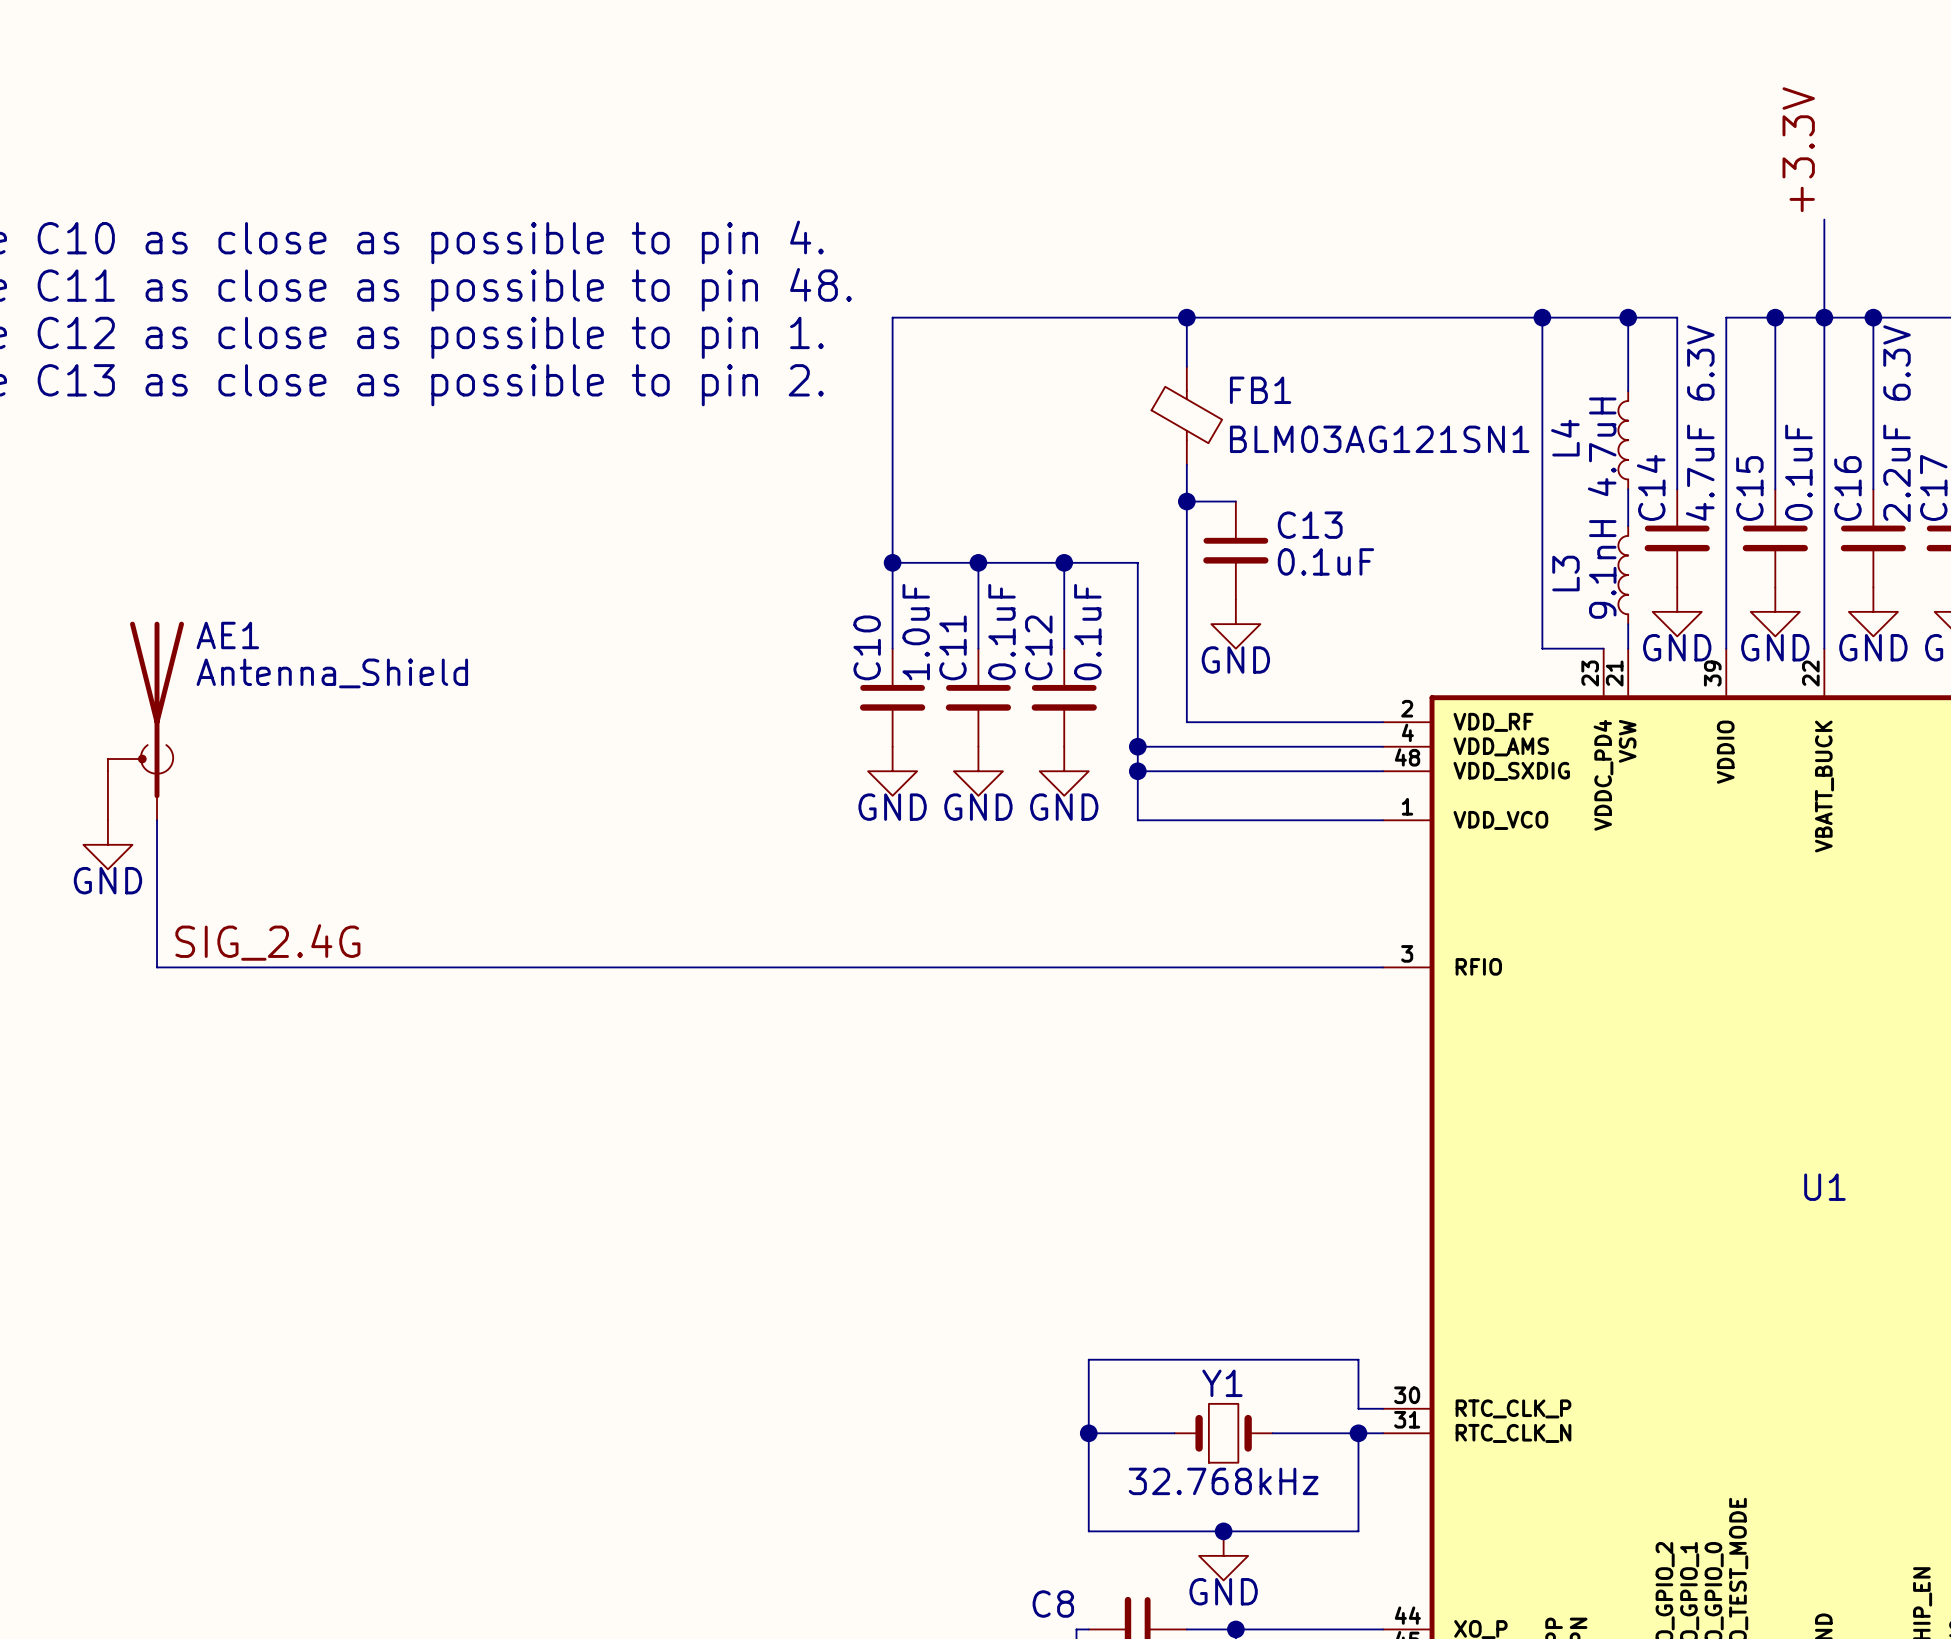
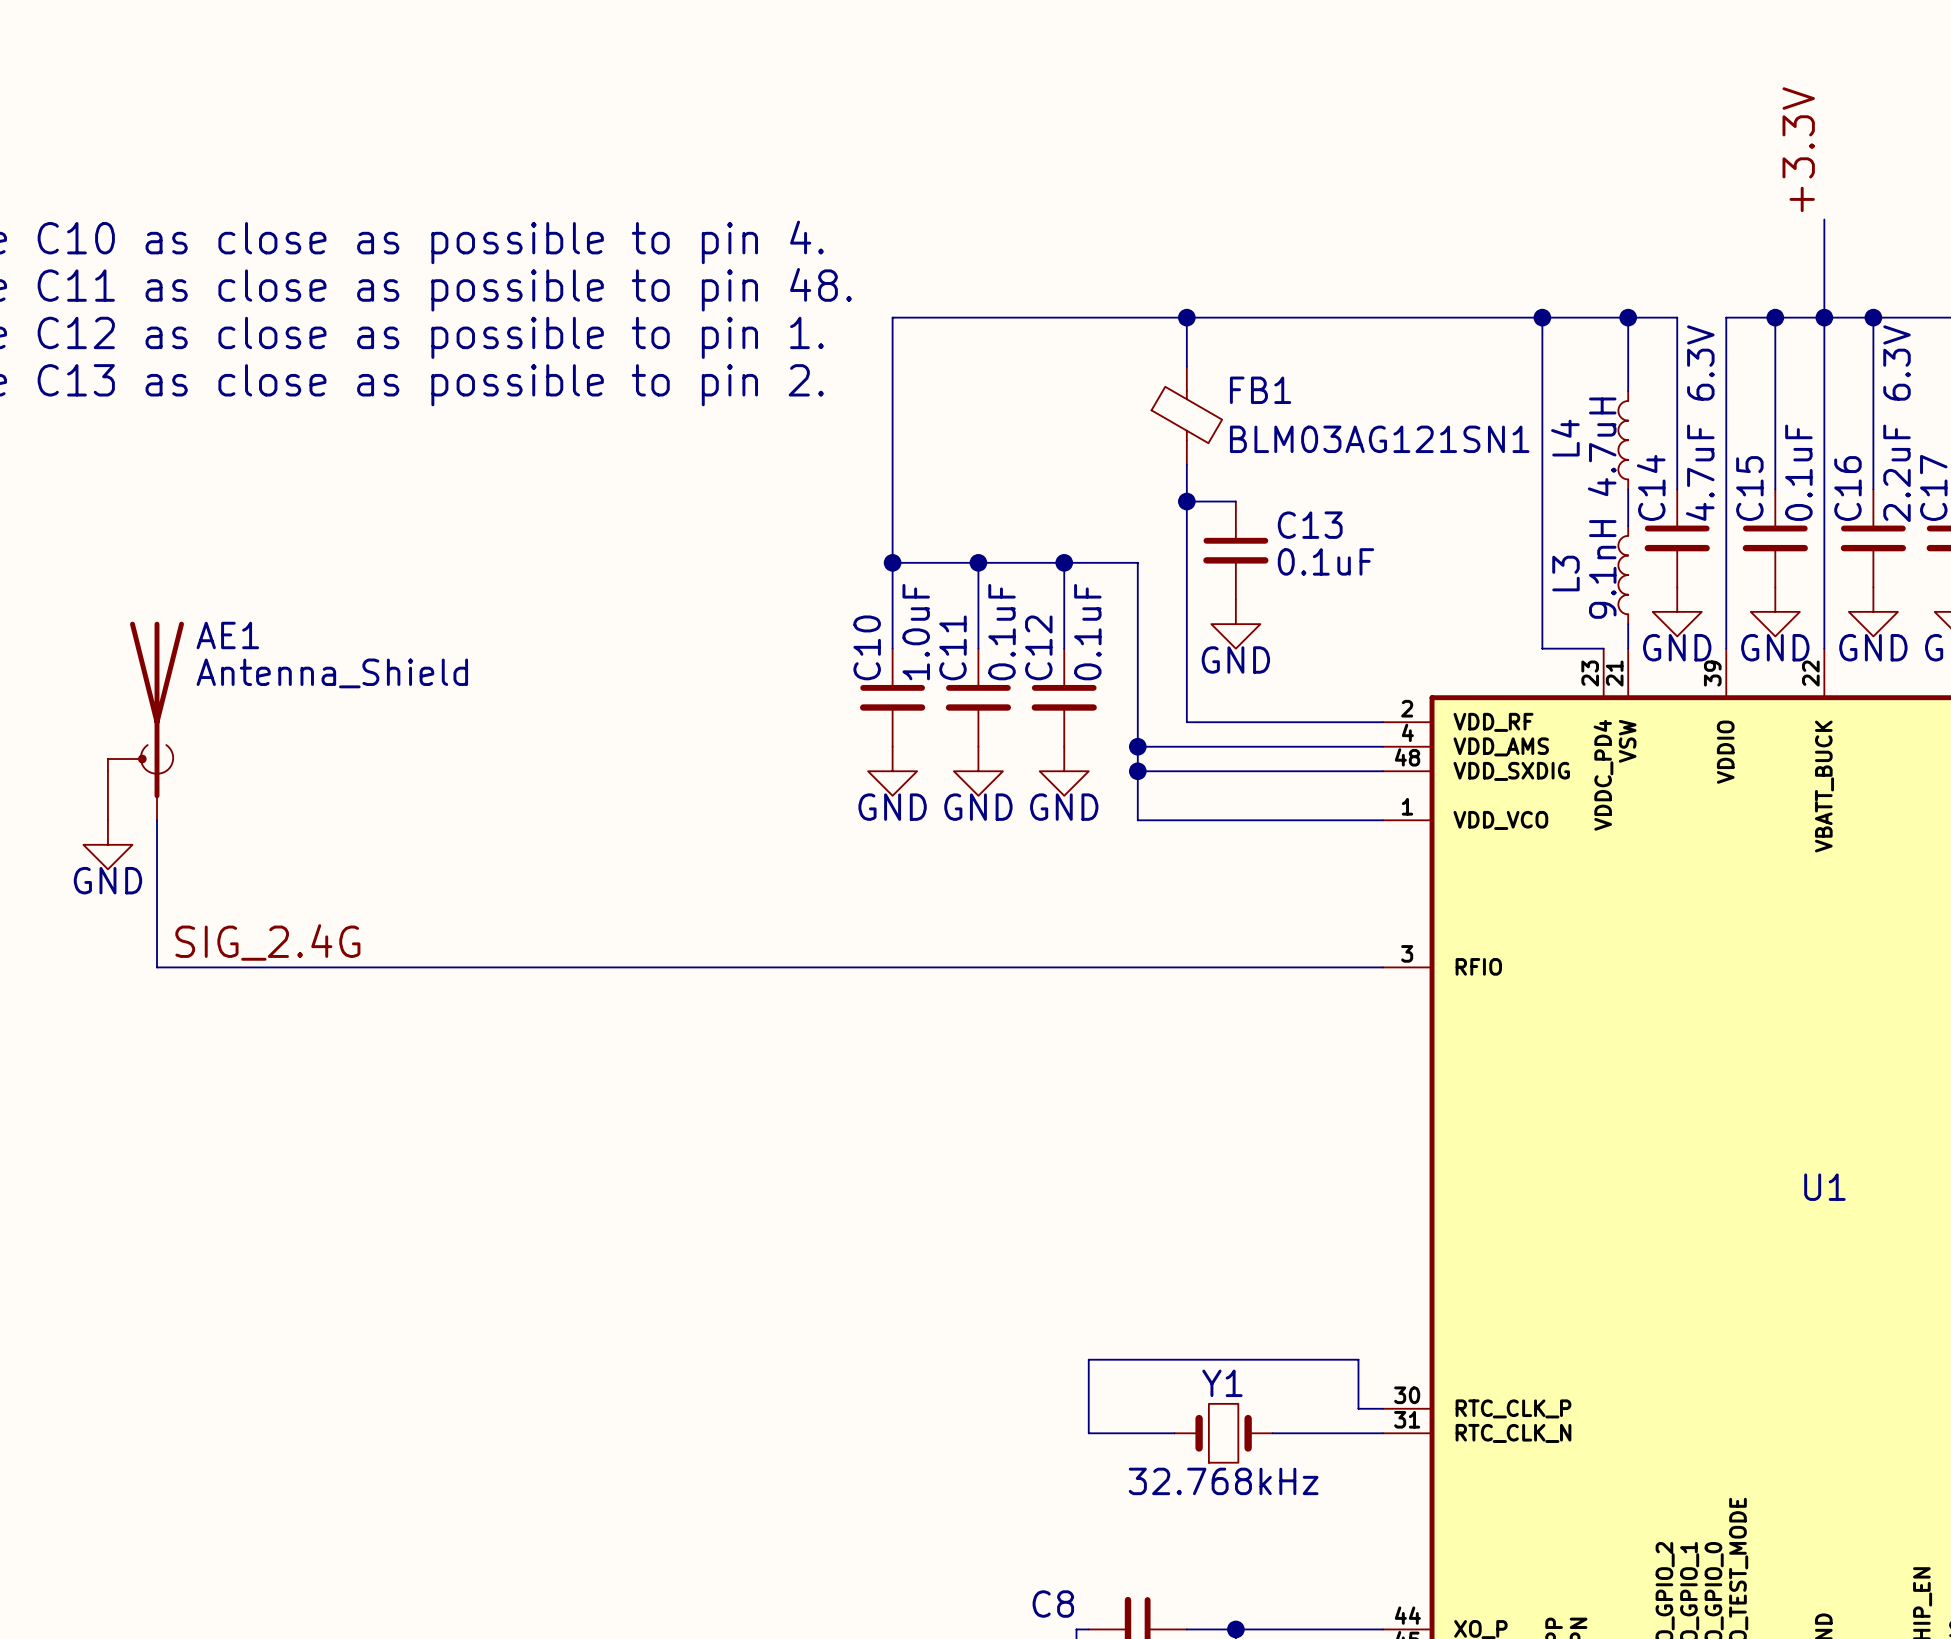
wire: (1088, 1433) (1088, 1531) (1358, 1531) (1358, 1433) -> none
junction: (1088, 1433) -> none
junction: (1358, 1433) -> none
junction: (1223, 1531) -> none
power symbol: GND (1223, 1555) -> none

